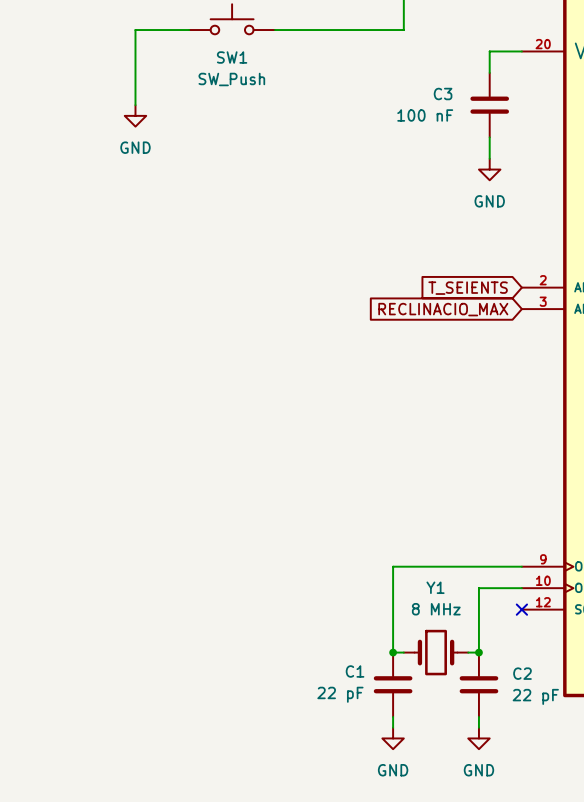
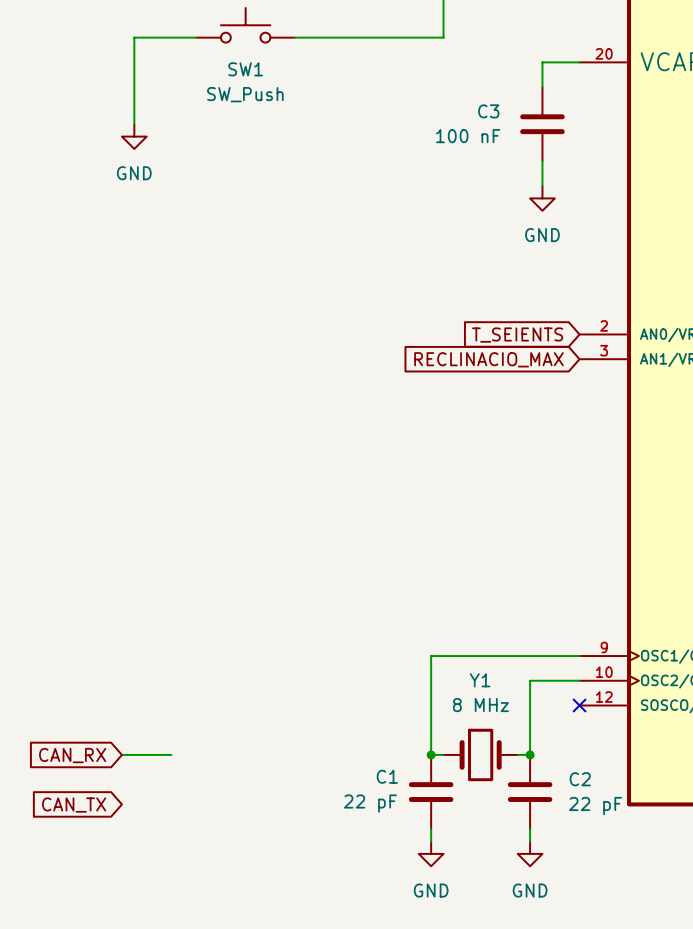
wire: none -> (121, 754) (171, 754)
global label: none -> CAN_RX (72, 755)
global label: none -> CAN_TX (74, 805)

